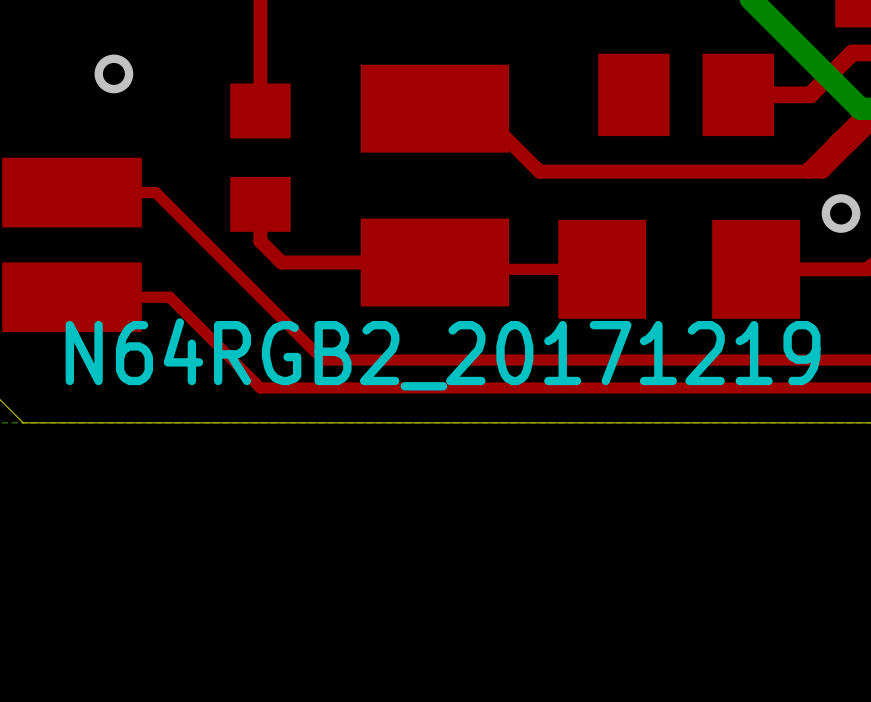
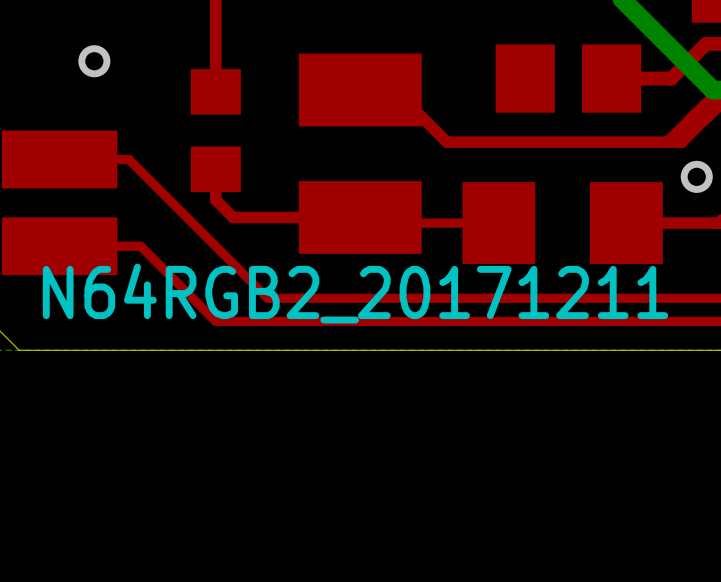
text: N64RGB2_20171219 (443, 354) -> N64RGB2_20171211 (355, 293)

